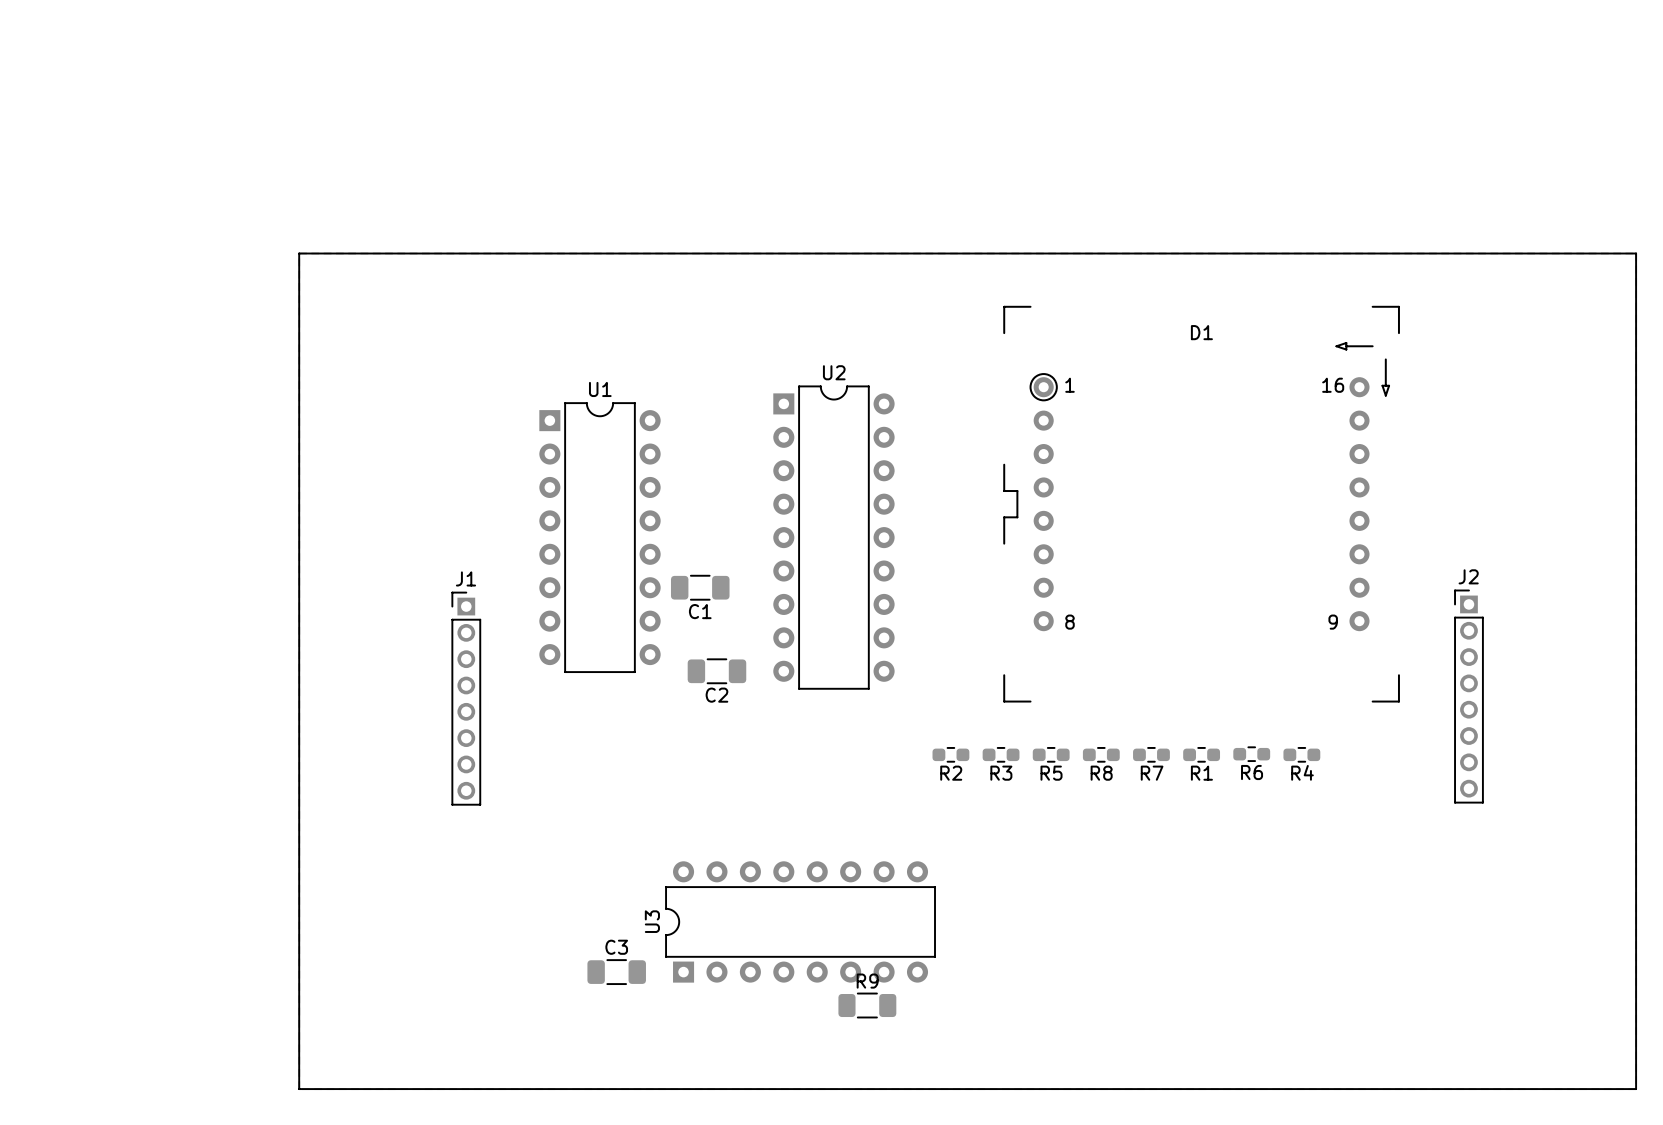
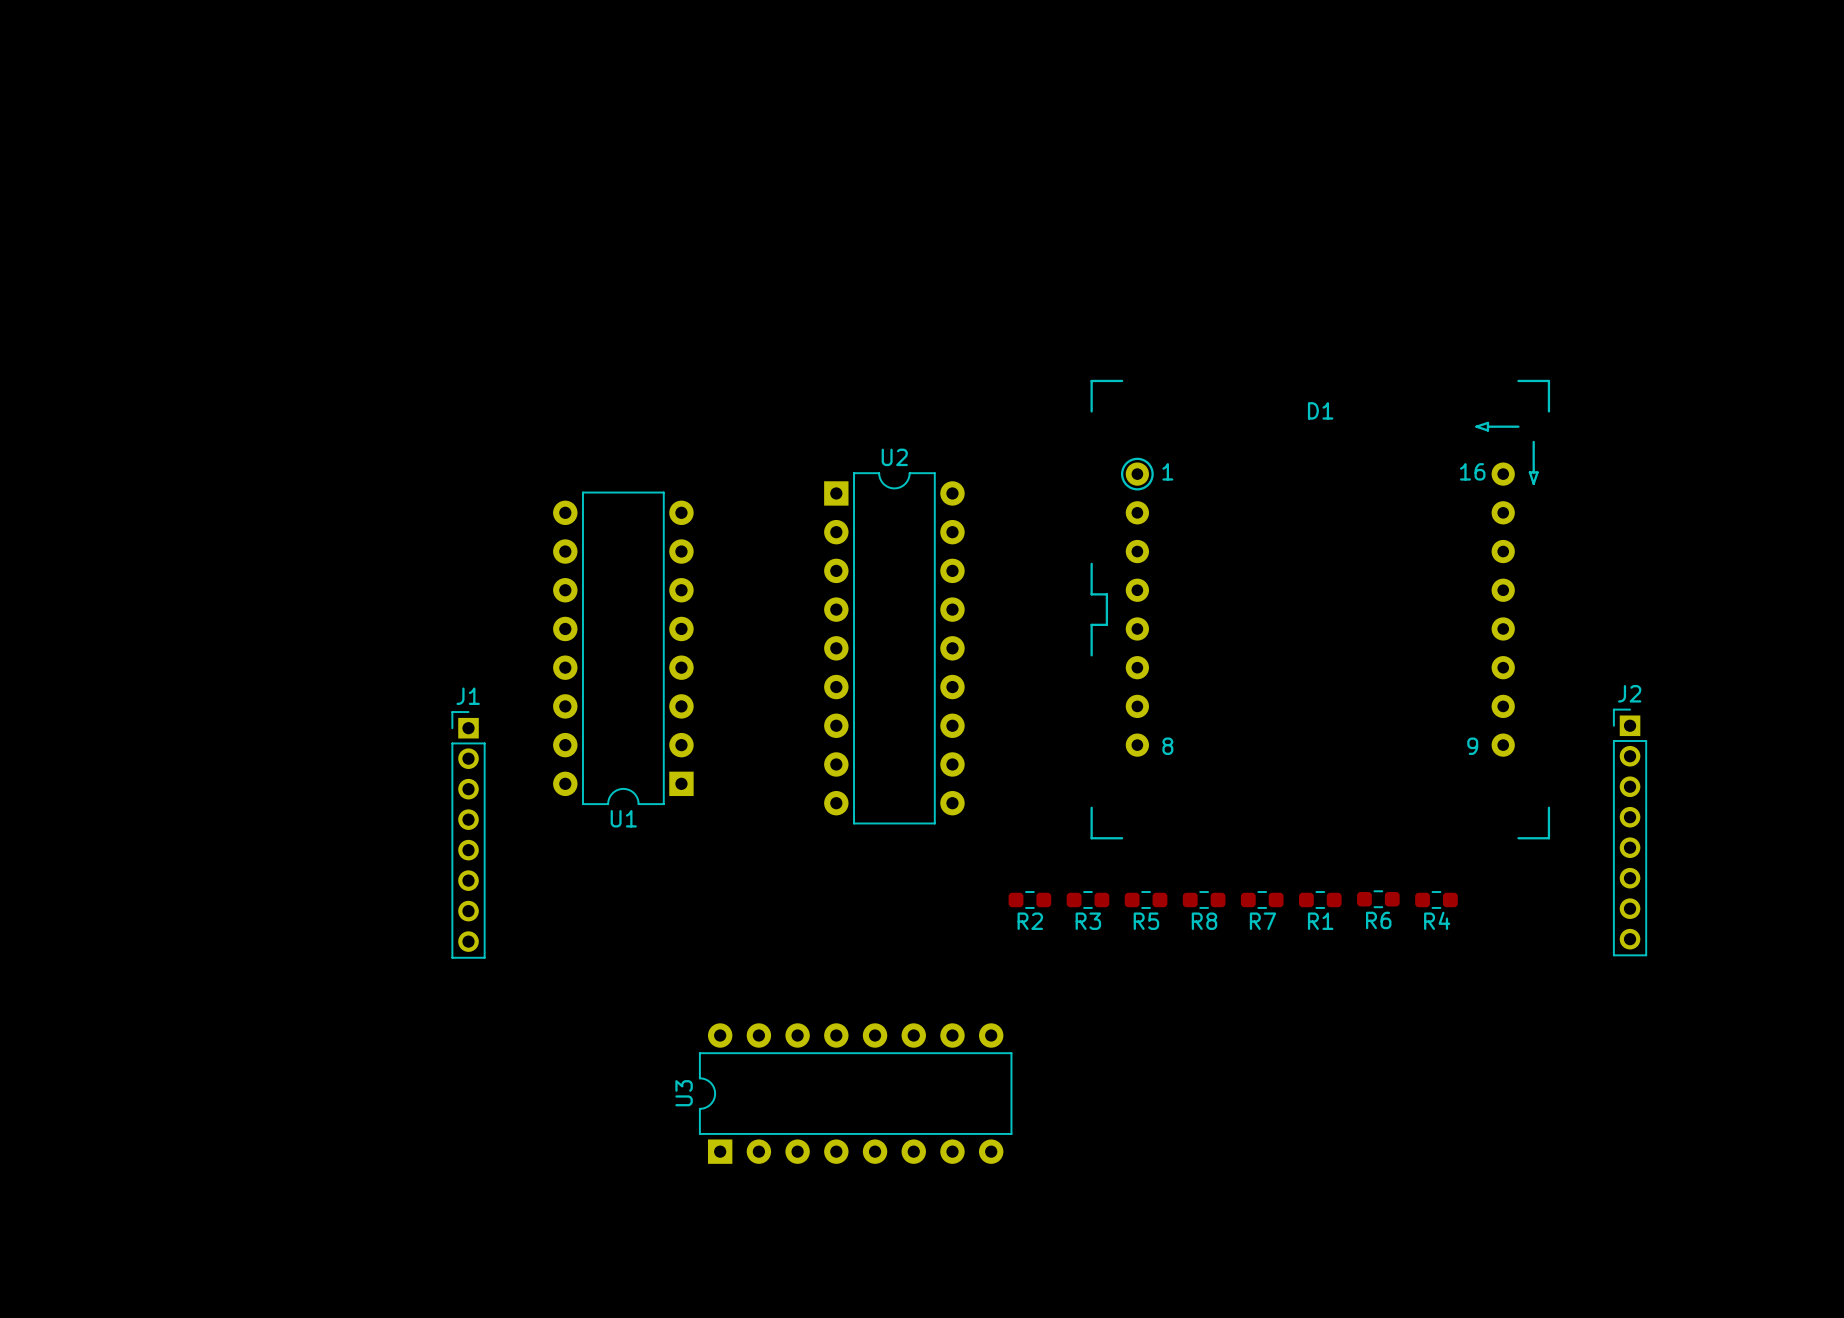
board edge: (299, 253) (299, 1089) (1636, 1089) (1636, 253) (299, 253) -> none
U1 rotation: 0° (599, 537) -> 180° (623, 648)
C1: (700, 587) -> none
C2: (716, 671) -> none
C3: (616, 972) -> none
R9: (867, 1005) -> none

